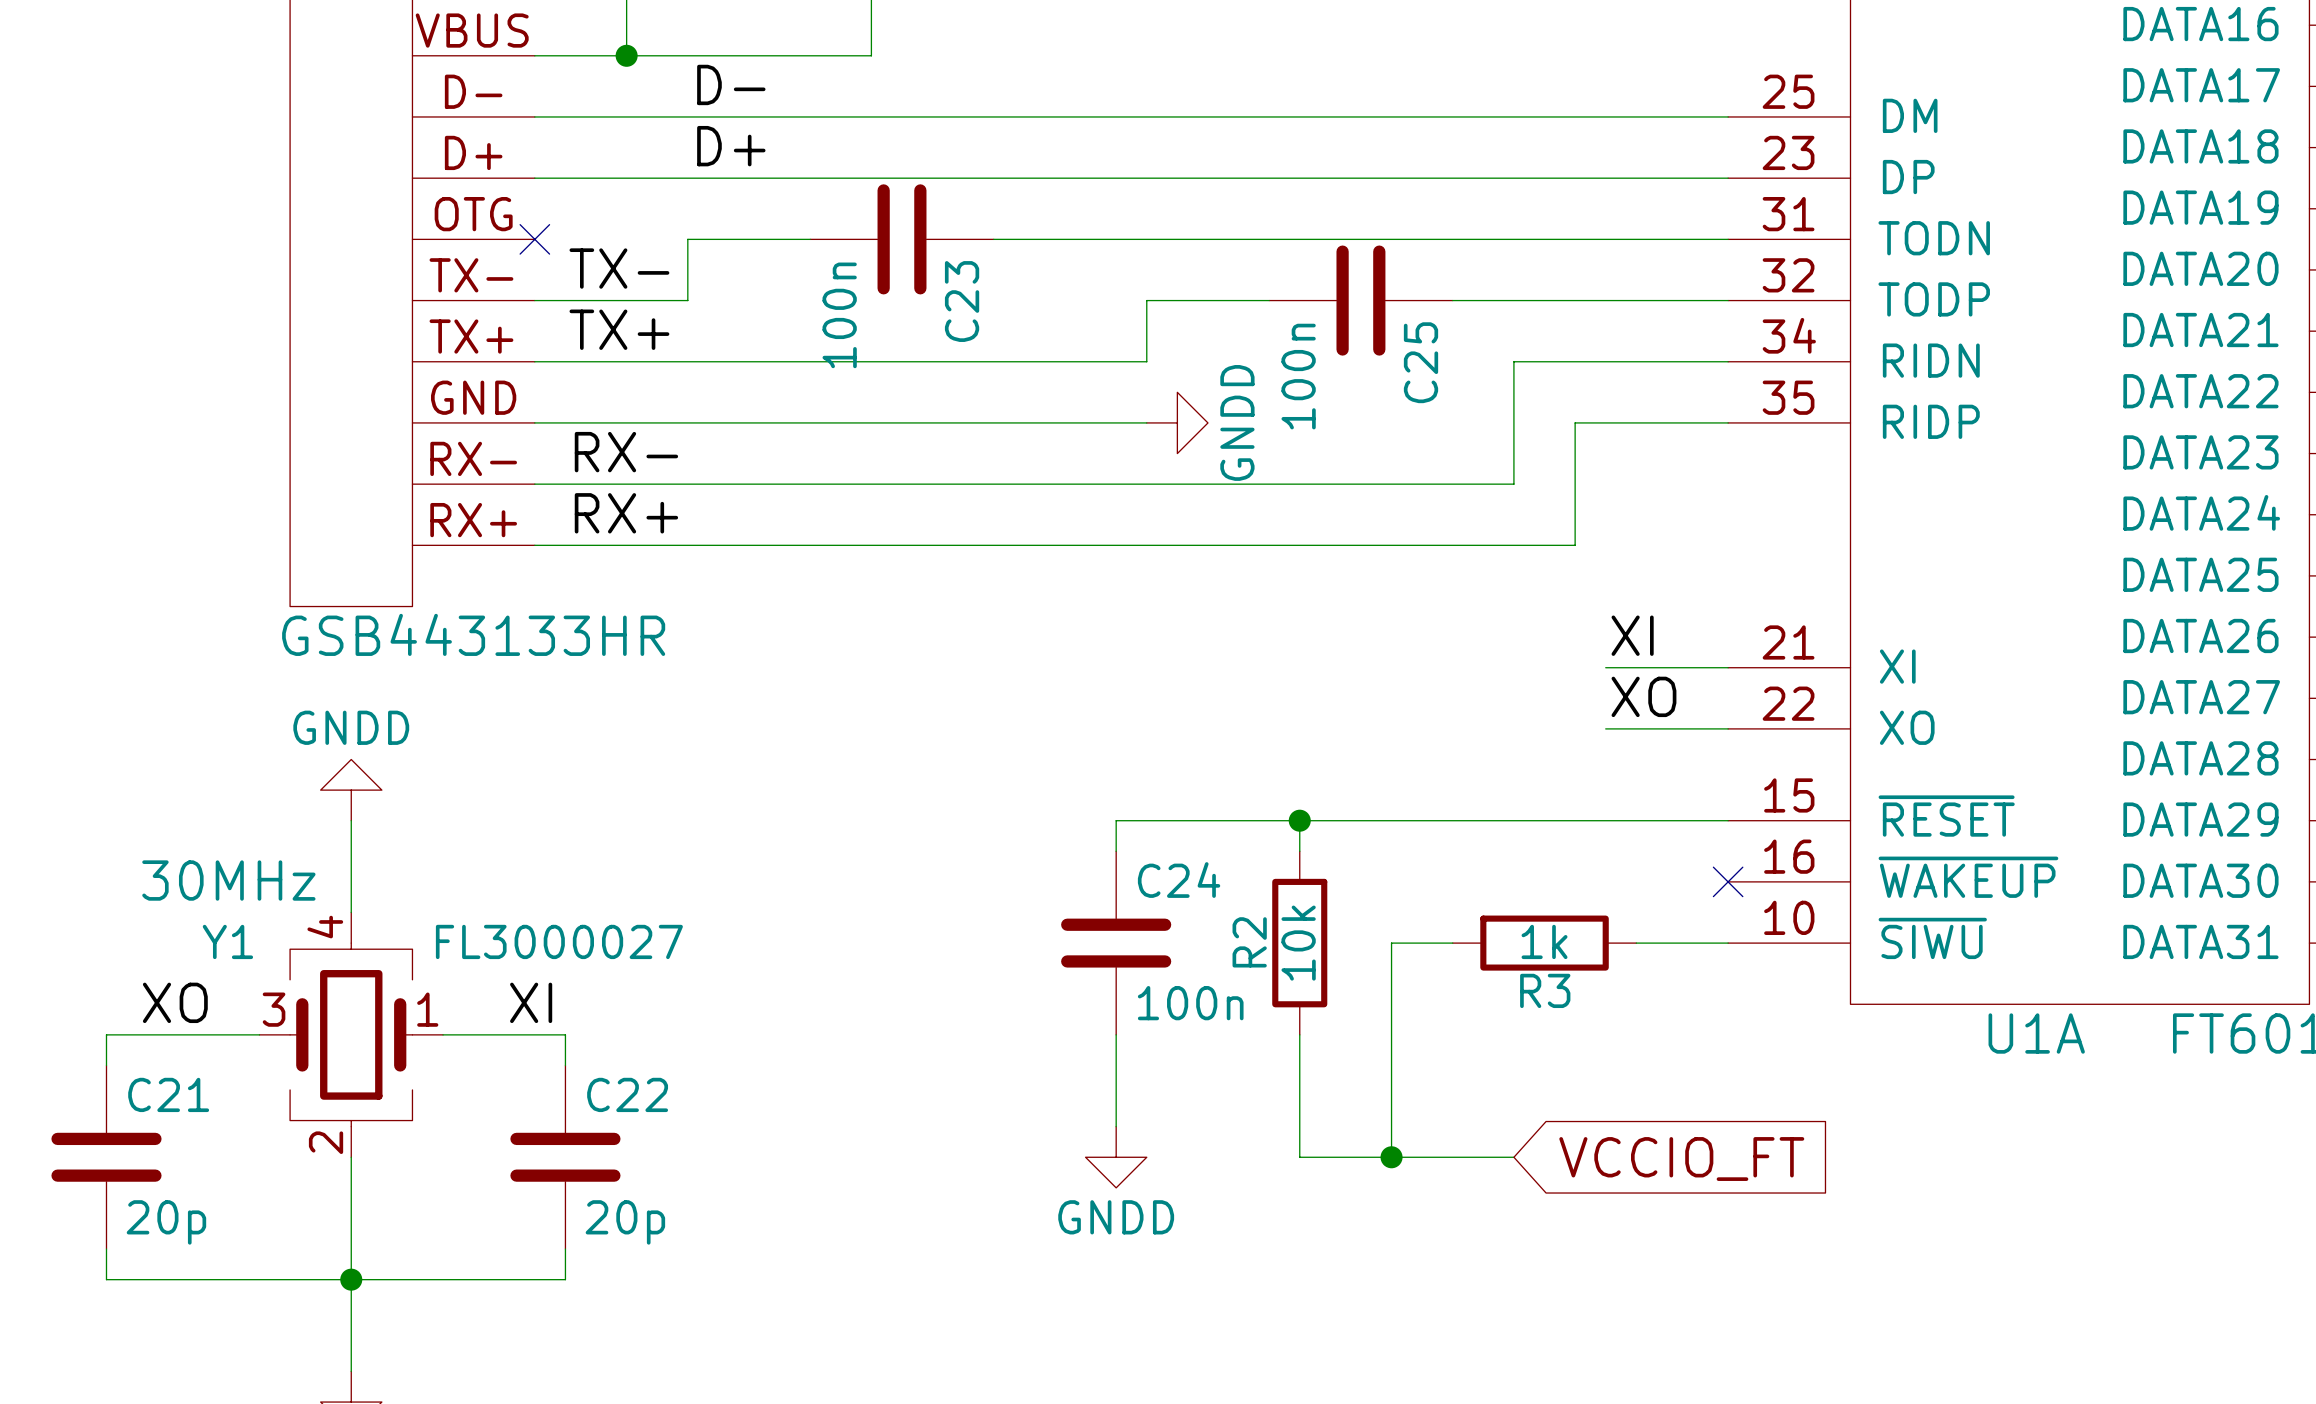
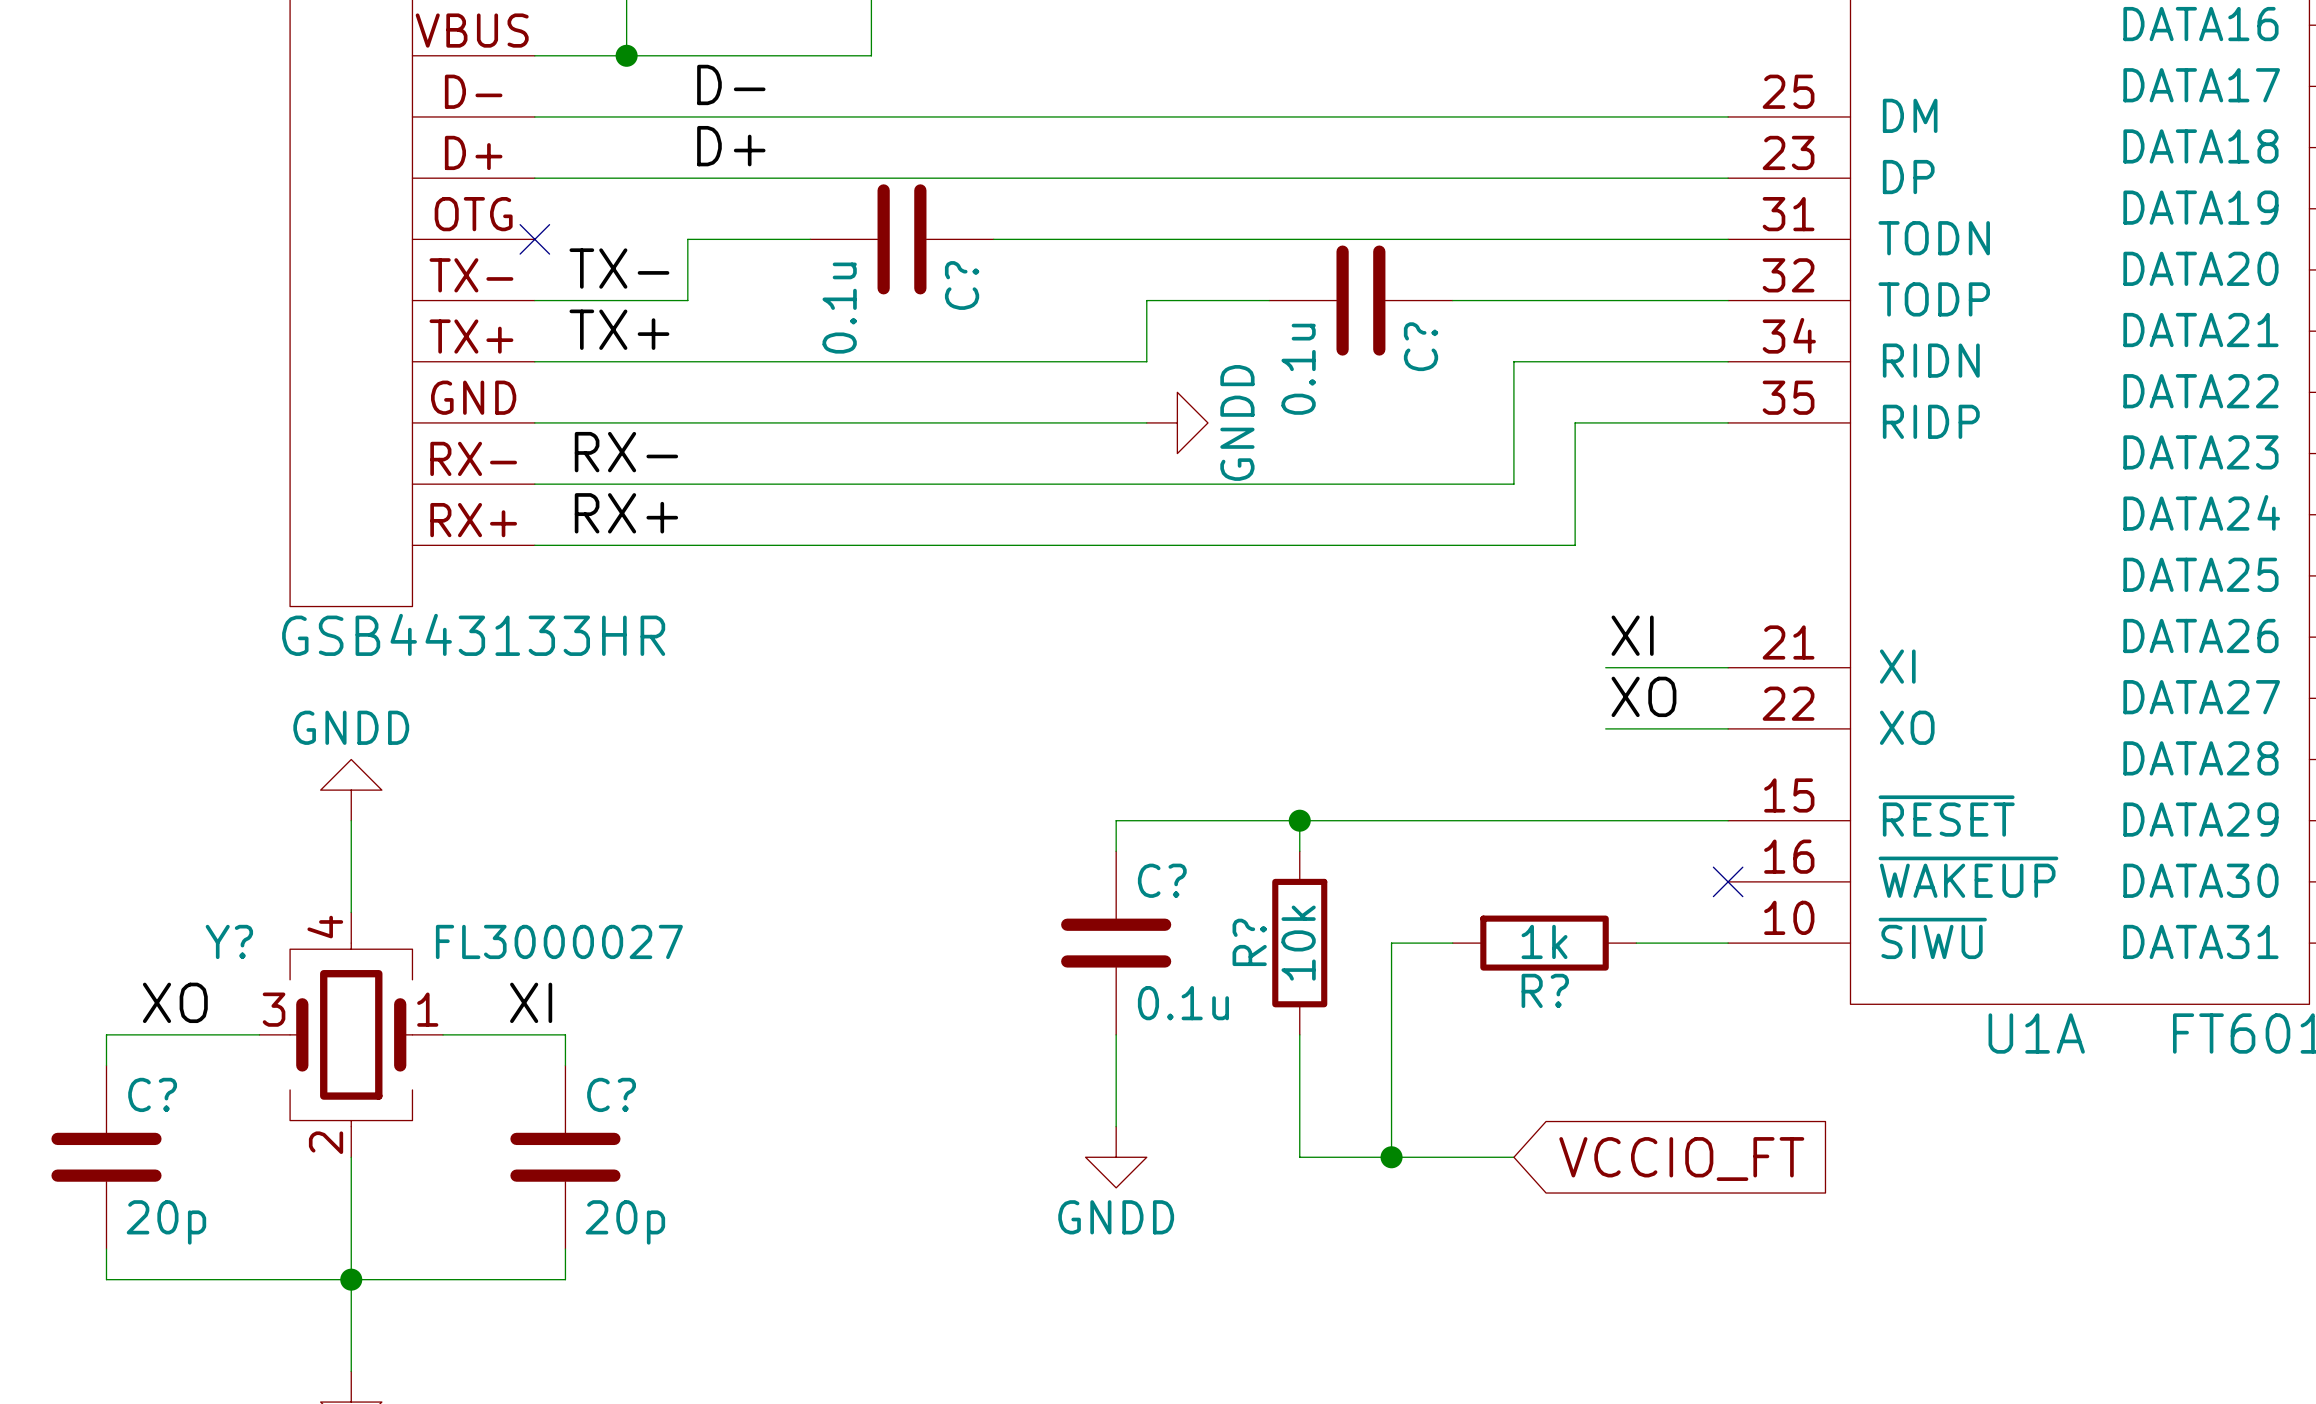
C23 name: C23 (962, 301) -> C? (962, 285)
C23 value: 100n (839, 315) -> 0.1u (839, 308)
C25 name: C25 (1421, 362) -> C? (1421, 346)
C25 value: 100n (1298, 376) -> 0.1u (1298, 369)
Y1 text: 30MHz (228, 880) -> none
C24 name: C24 (1179, 880) -> C? (1162, 880)
Y1 name: Y1 (227, 941) -> Y? (229, 941)
R2 name: R2 (1249, 942) -> R? (1249, 942)
R3 name: R3 (1545, 990) -> R? (1545, 990)
C24 value: 100n (1190, 1003) -> 0.1u (1183, 1003)
C21 name: C21 (168, 1094) -> C? (152, 1094)
C22 name: C22 (627, 1094) -> C? (611, 1094)

